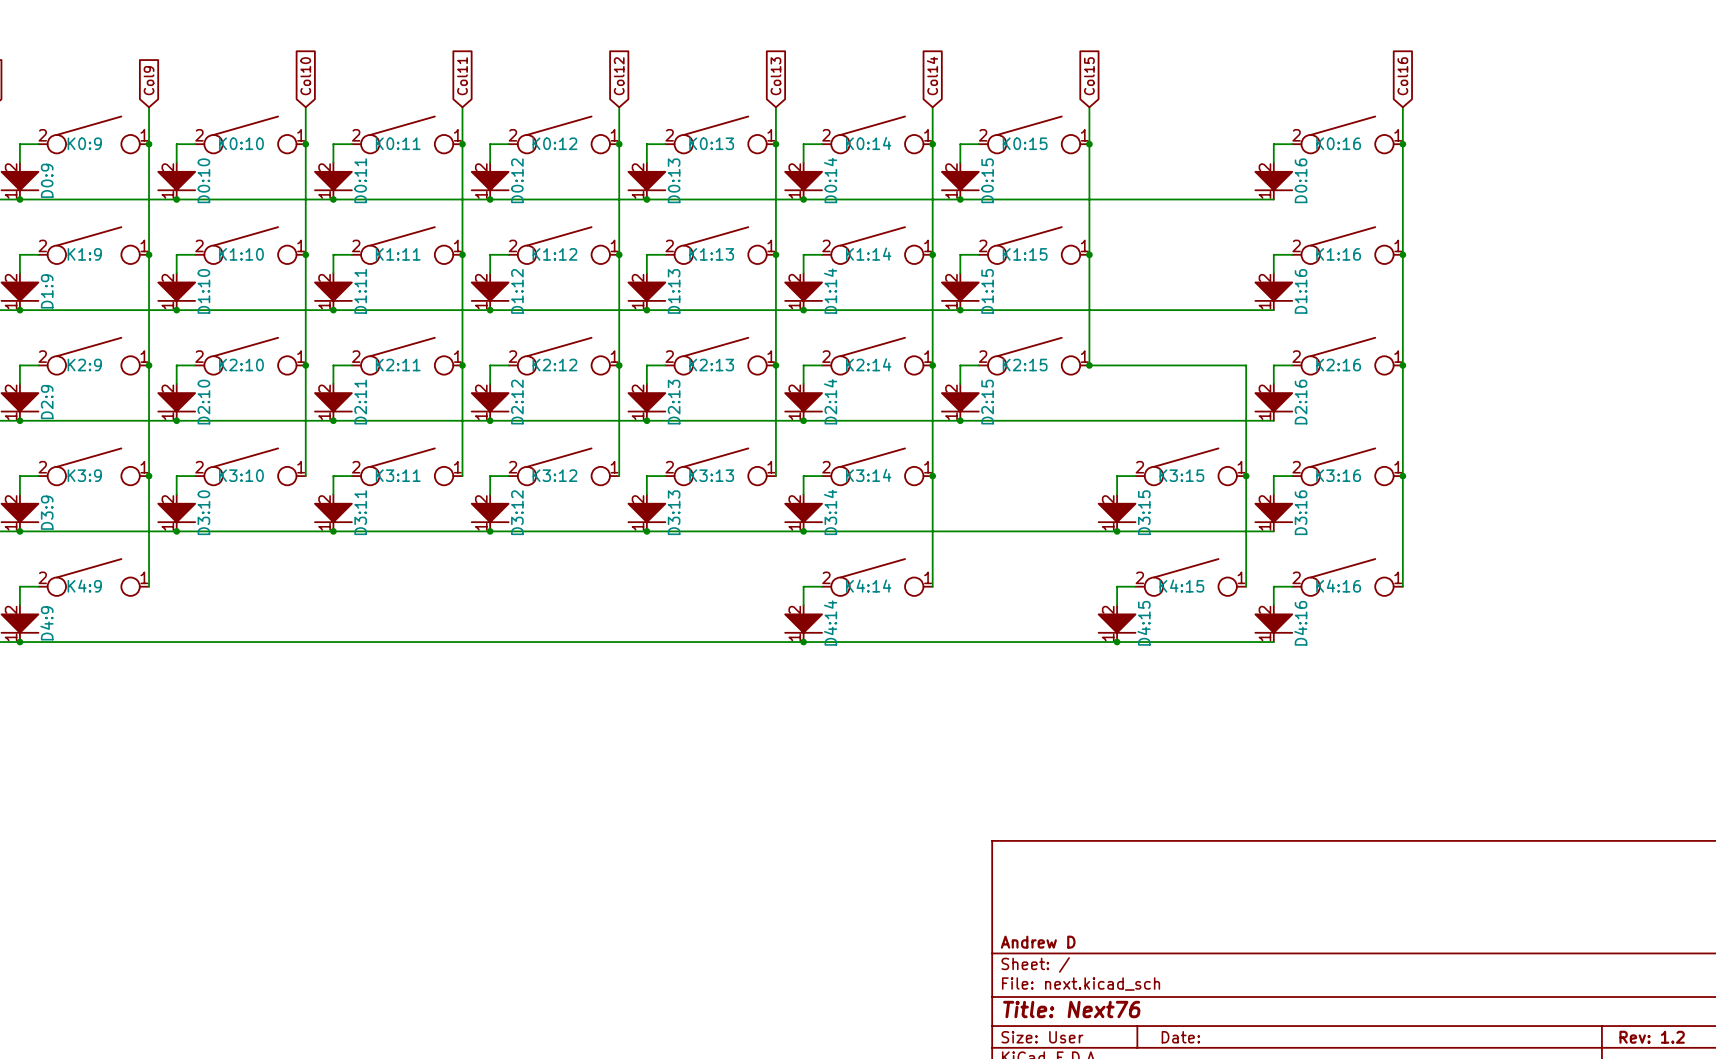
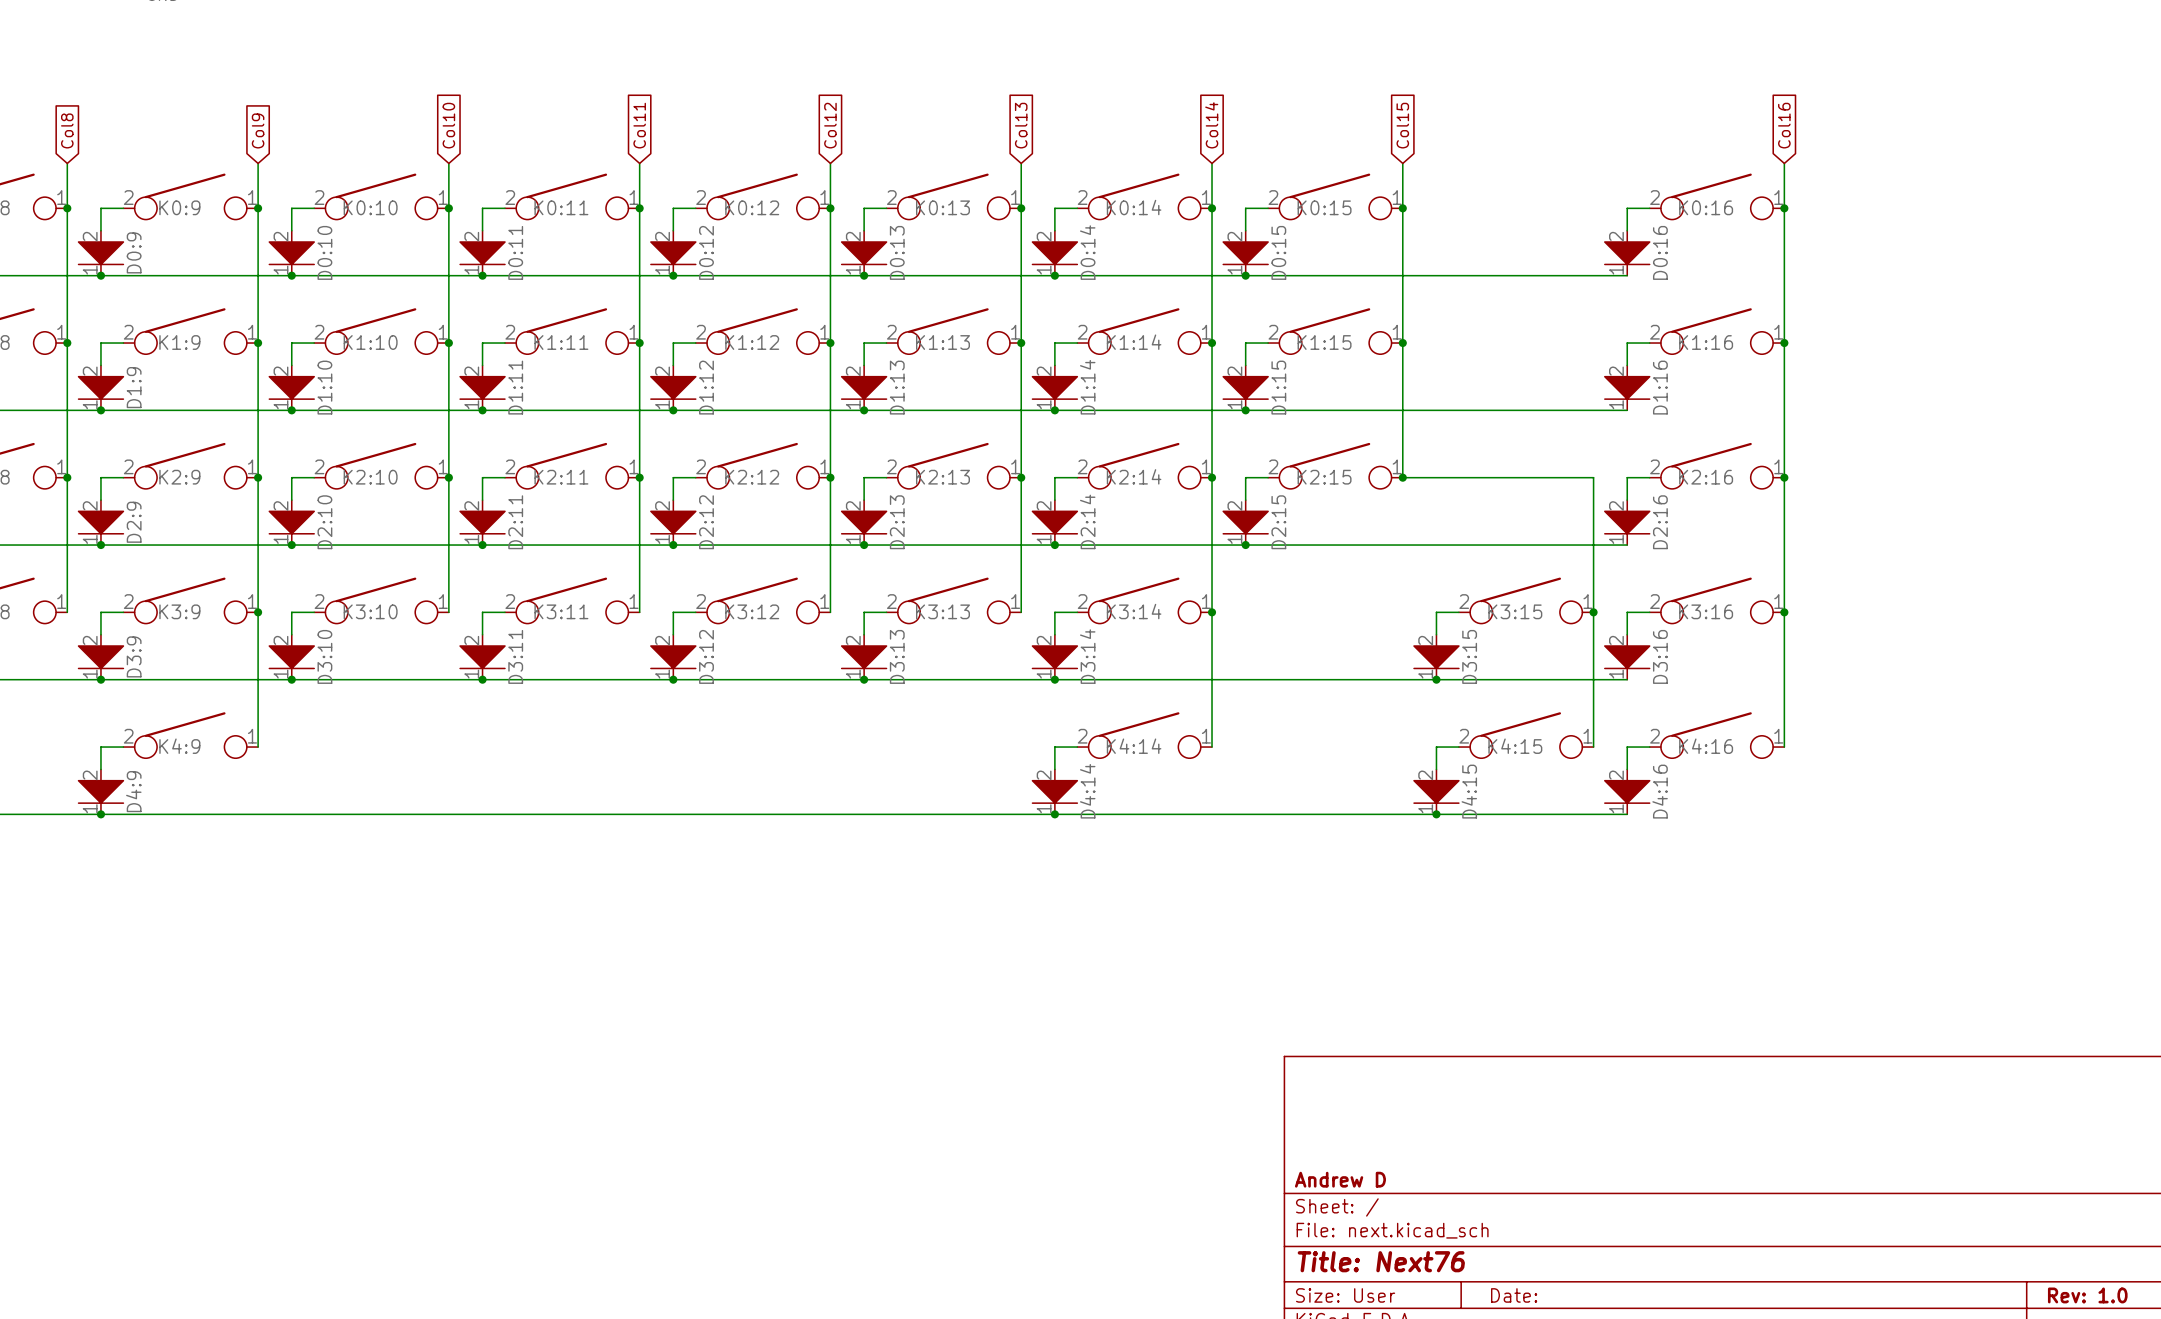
title block: Rev: 1.2 (1652, 1037) -> Rev: 1.0 (2087, 1295)

